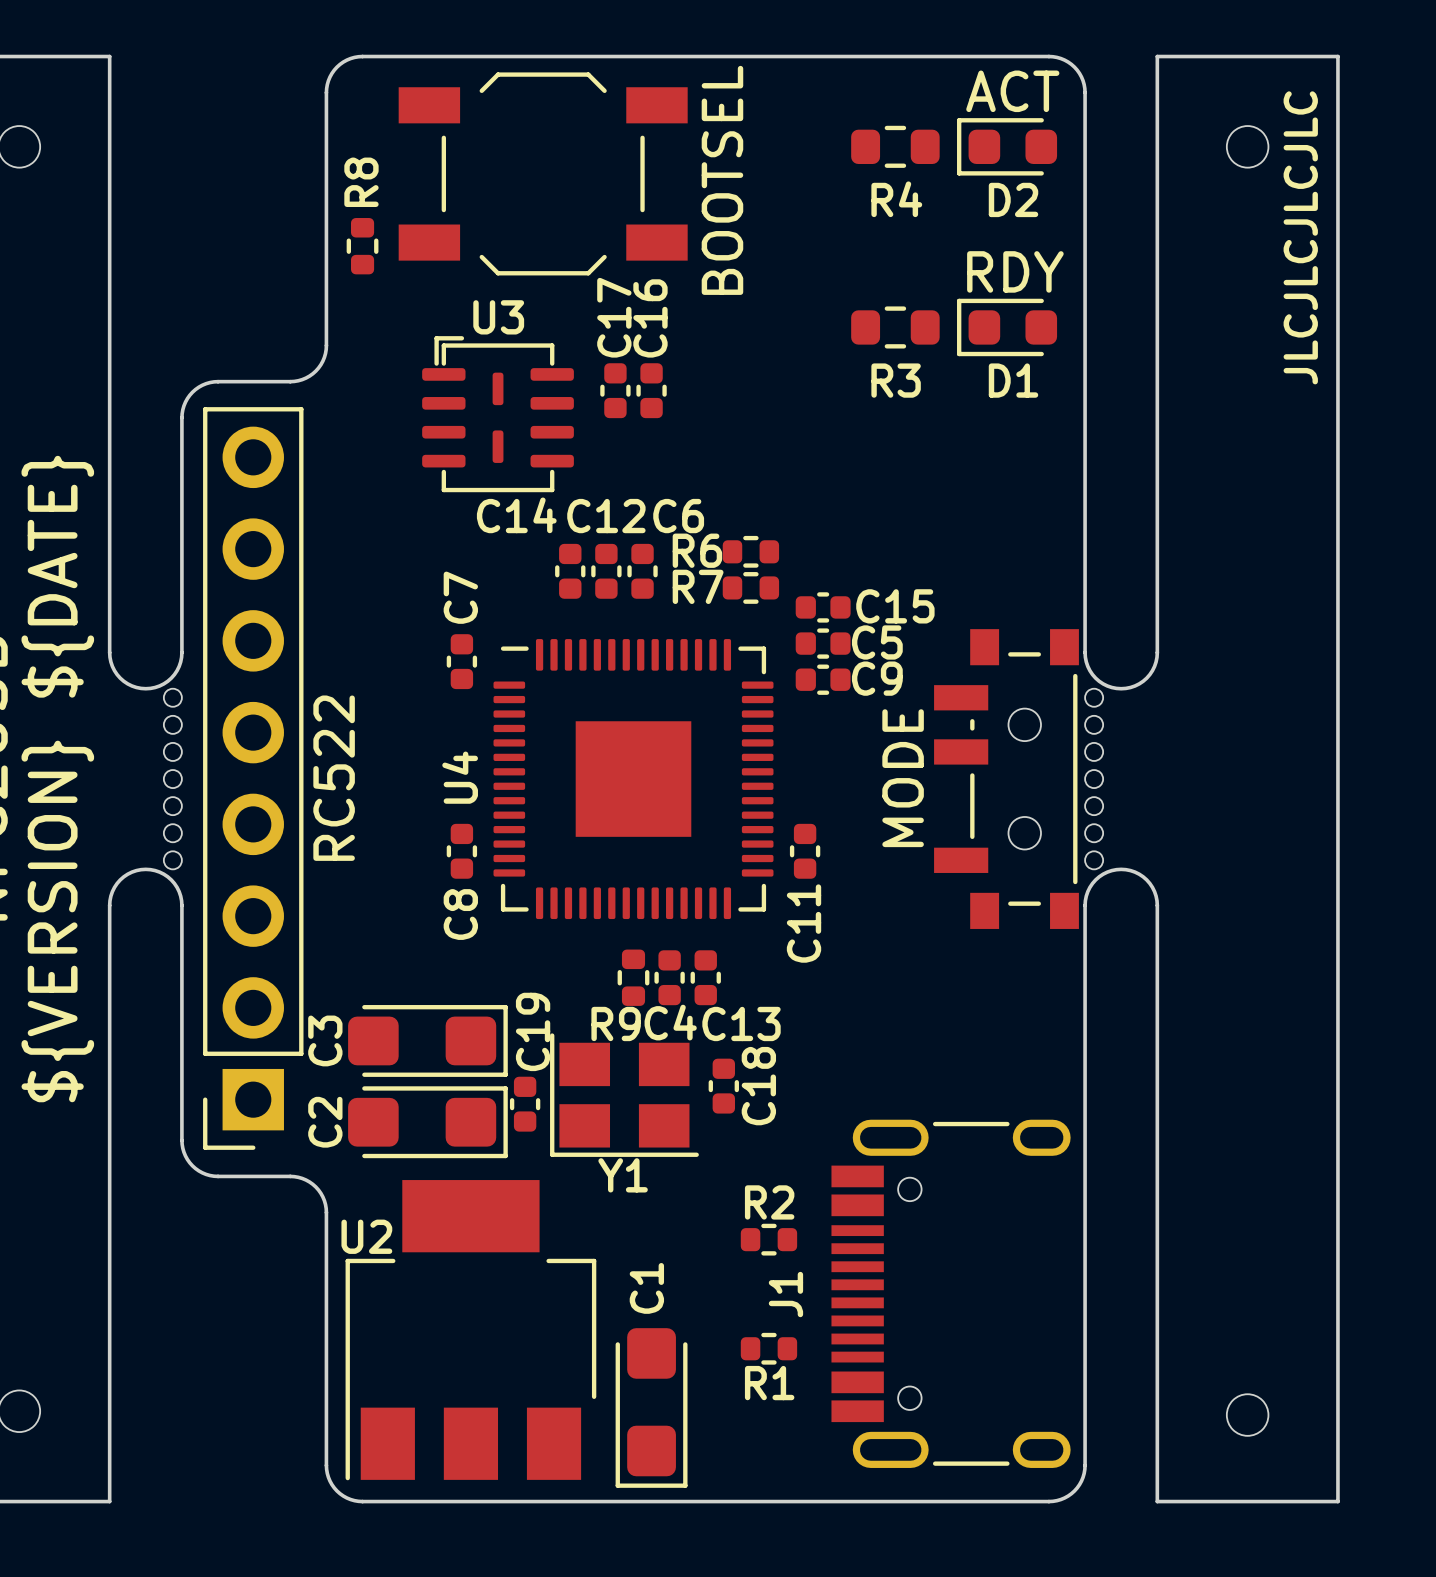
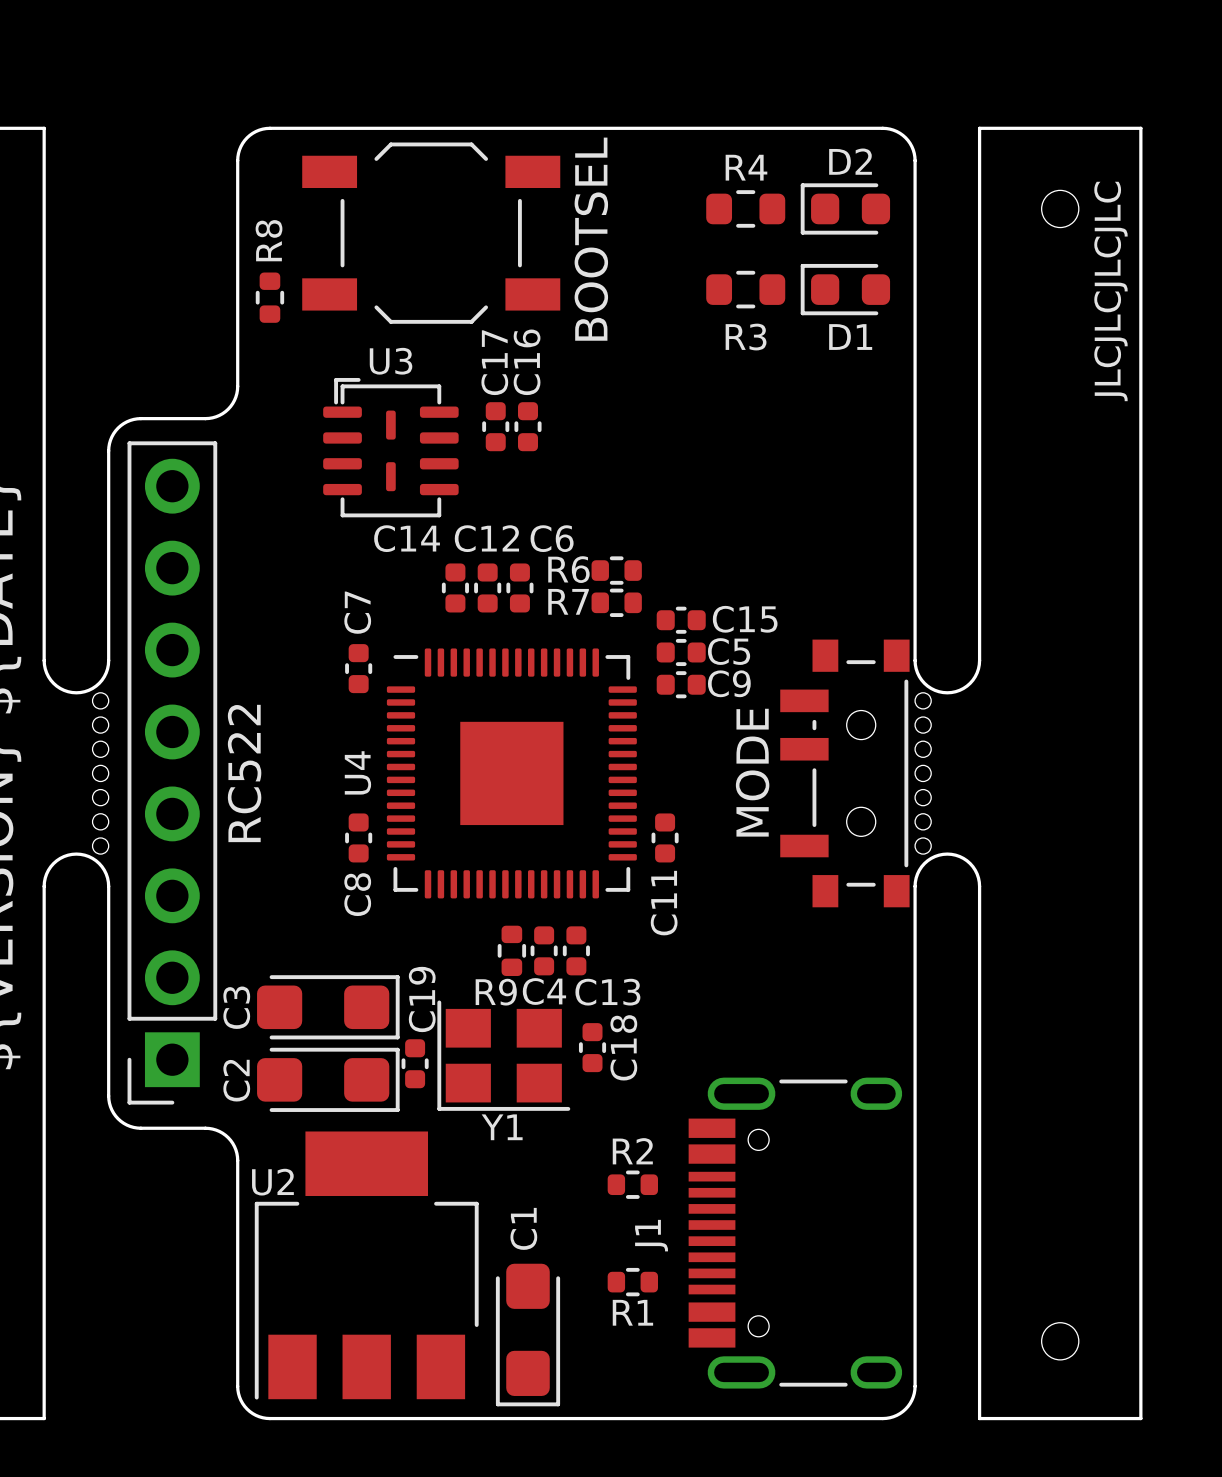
D2 value: ACT (1012, 91) -> none
R4 name position: R4 (896, 199) -> R4 (746, 167)
D2 name position: D2 (1013, 199) -> D2 (850, 161)
D1 value: RDY (1015, 271) -> none
R3 position: (895, 327) -> (745, 289)
D1 position: (1007, 327) -> (845, 289)

